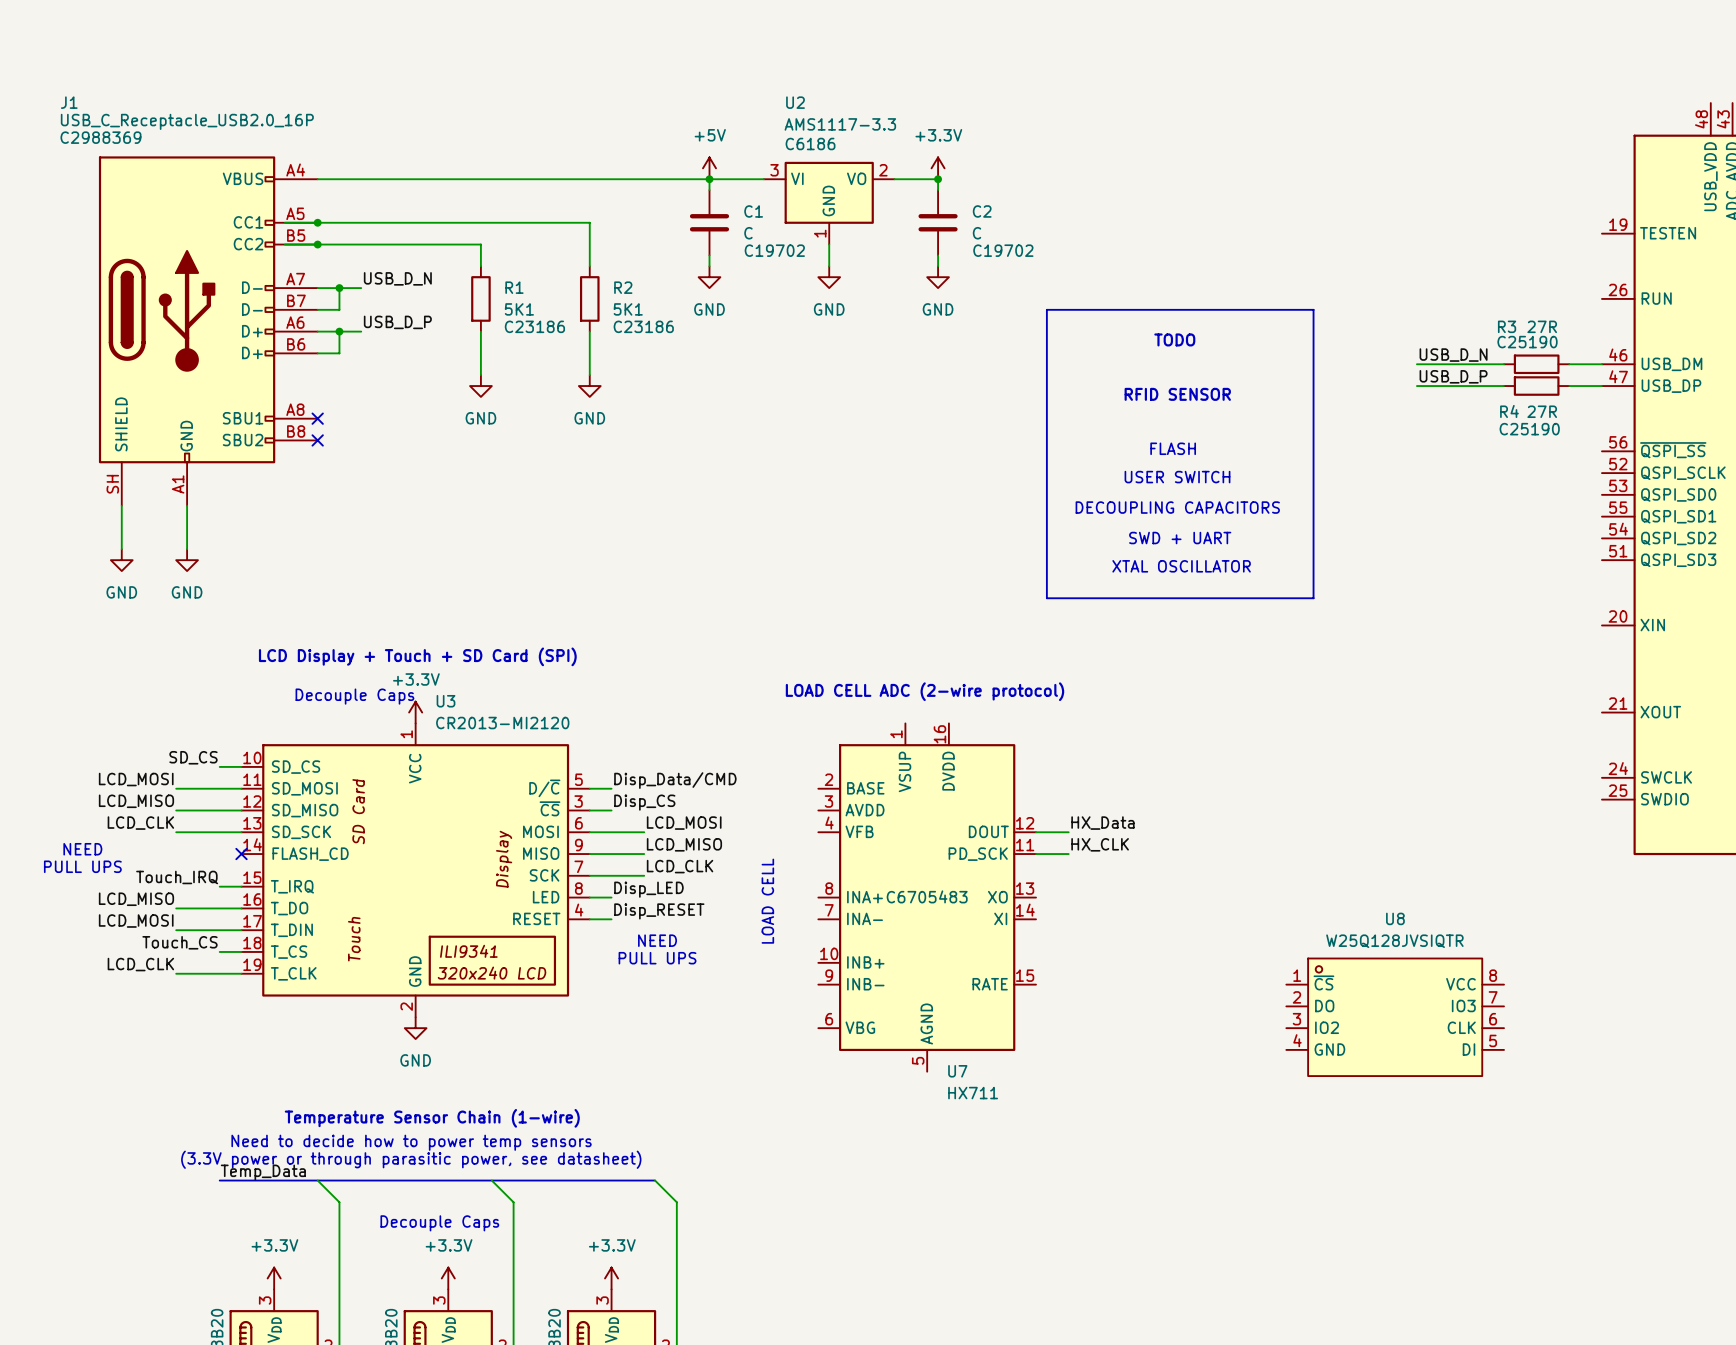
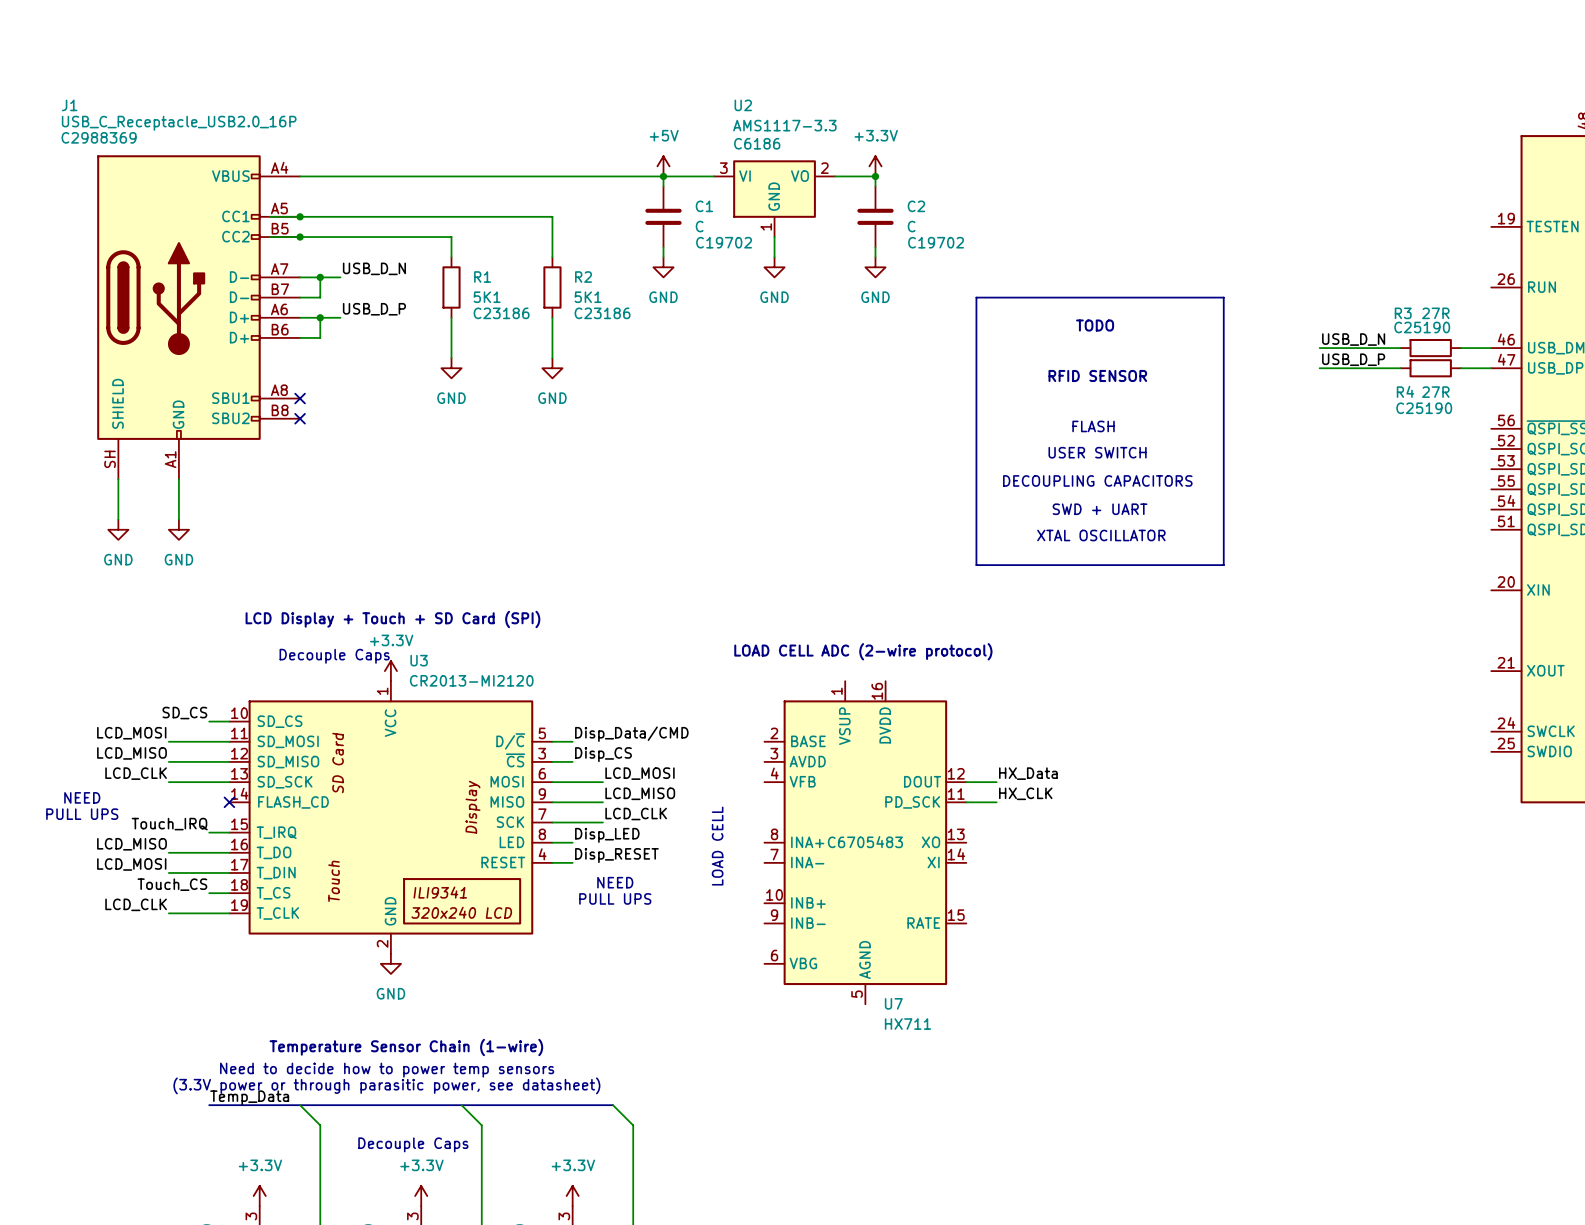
U8: W25Q128JVSIQTR (1395, 1017) -> none

